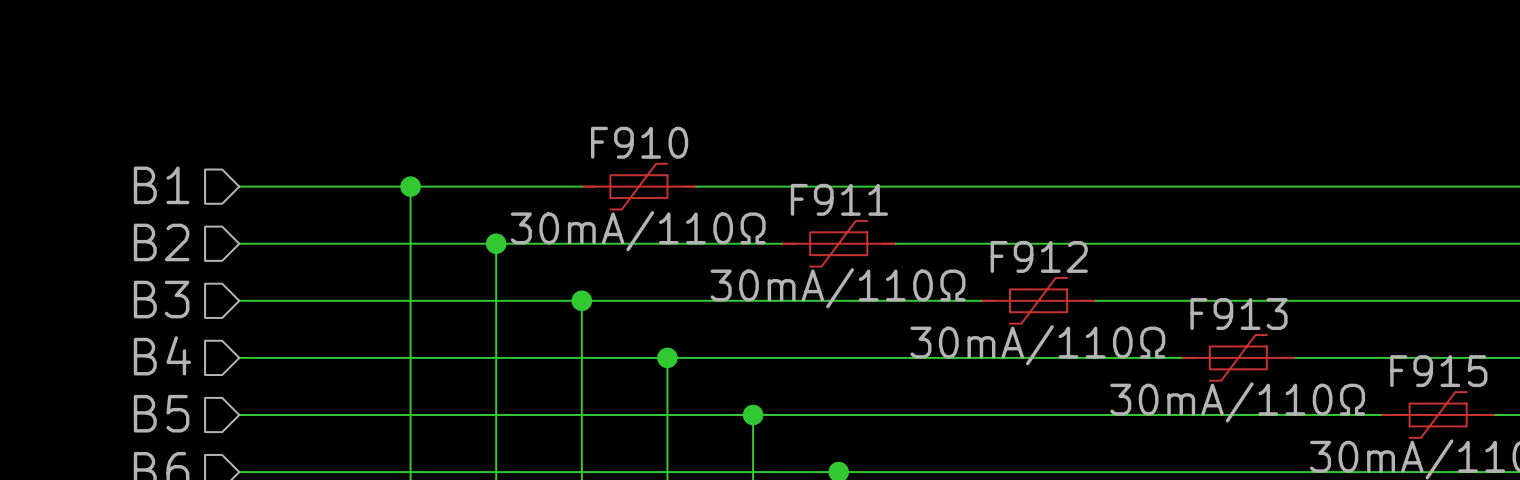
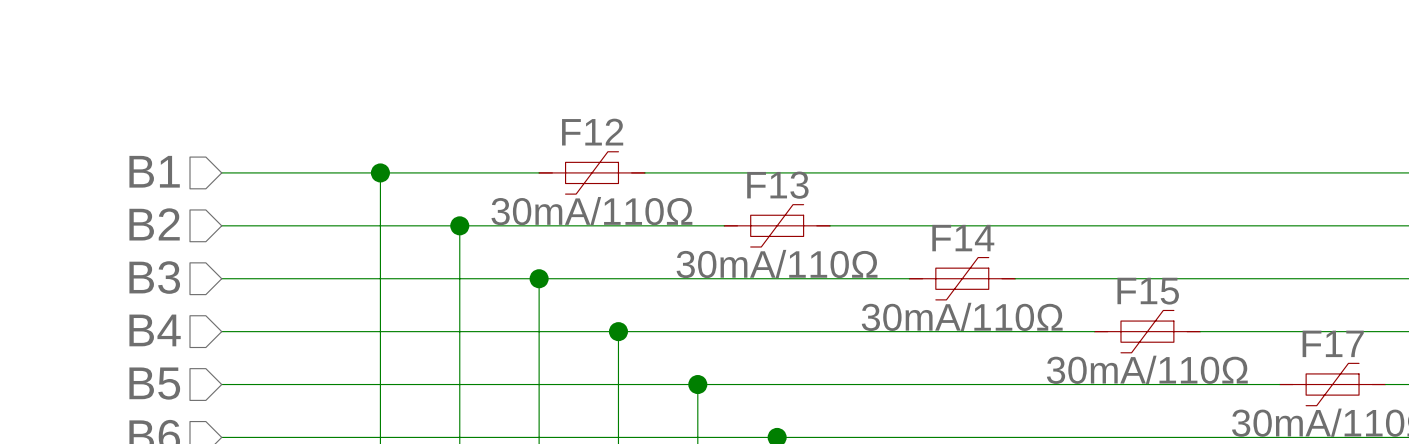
F910 name: F910 (639, 142) -> F12 (592, 132)
F911 name: F911 (839, 199) -> F13 (777, 185)
F912 name: F912 (1039, 256) -> F14 (963, 238)
F913 name: F913 (1239, 314) -> F15 (1148, 291)
F915 name: F915 (1438, 371) -> F17 (1333, 343)

